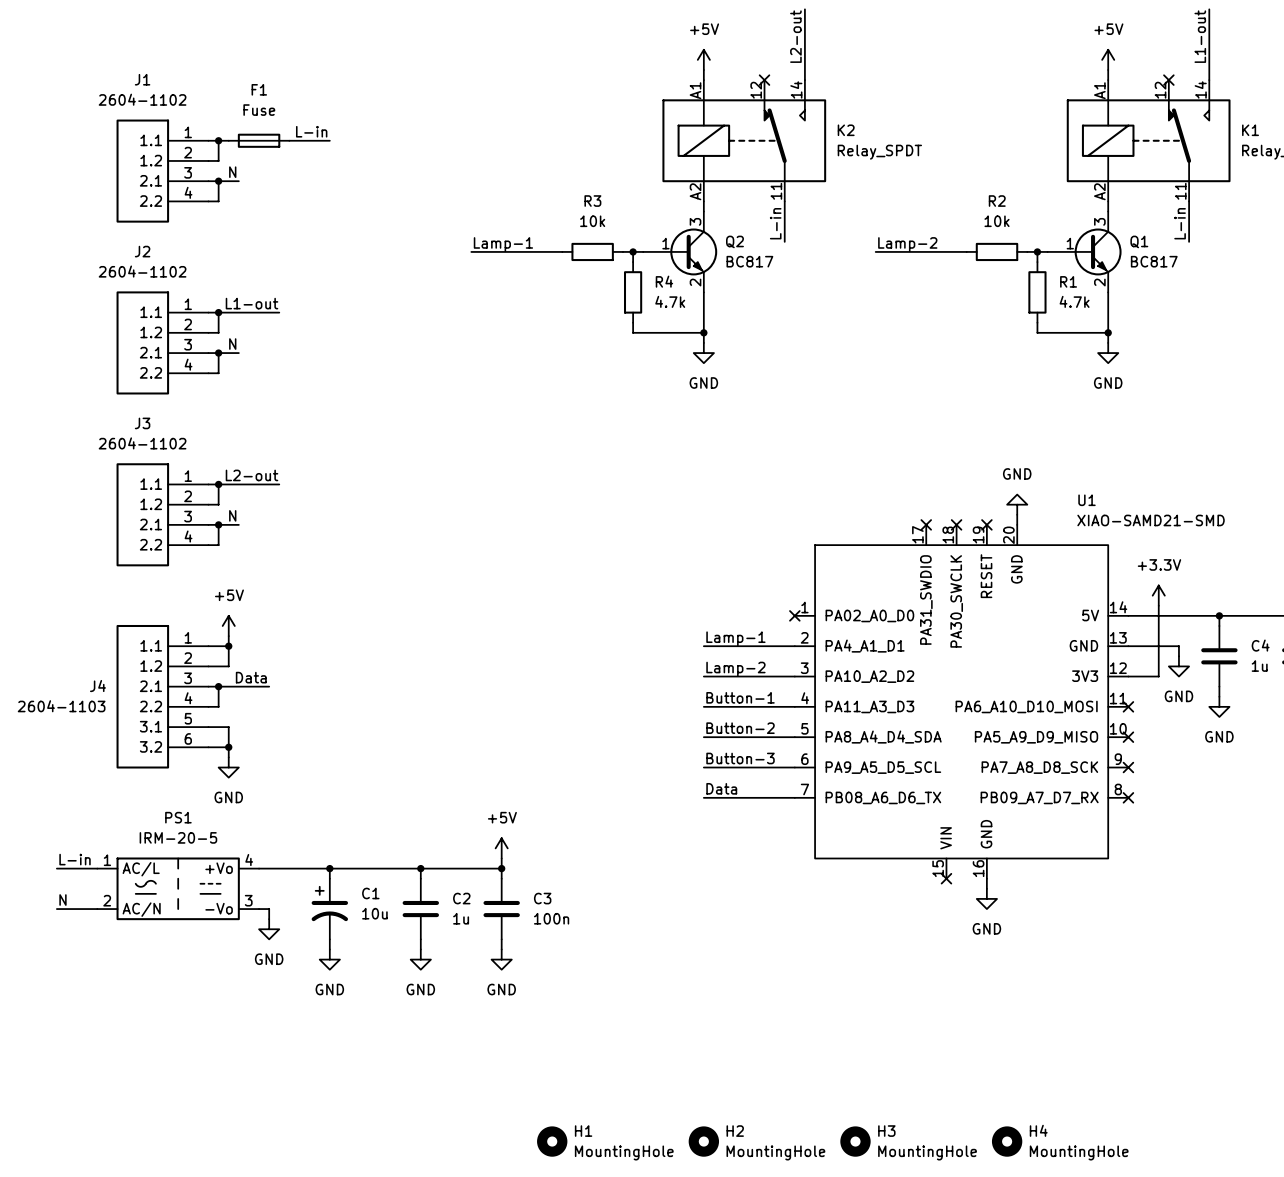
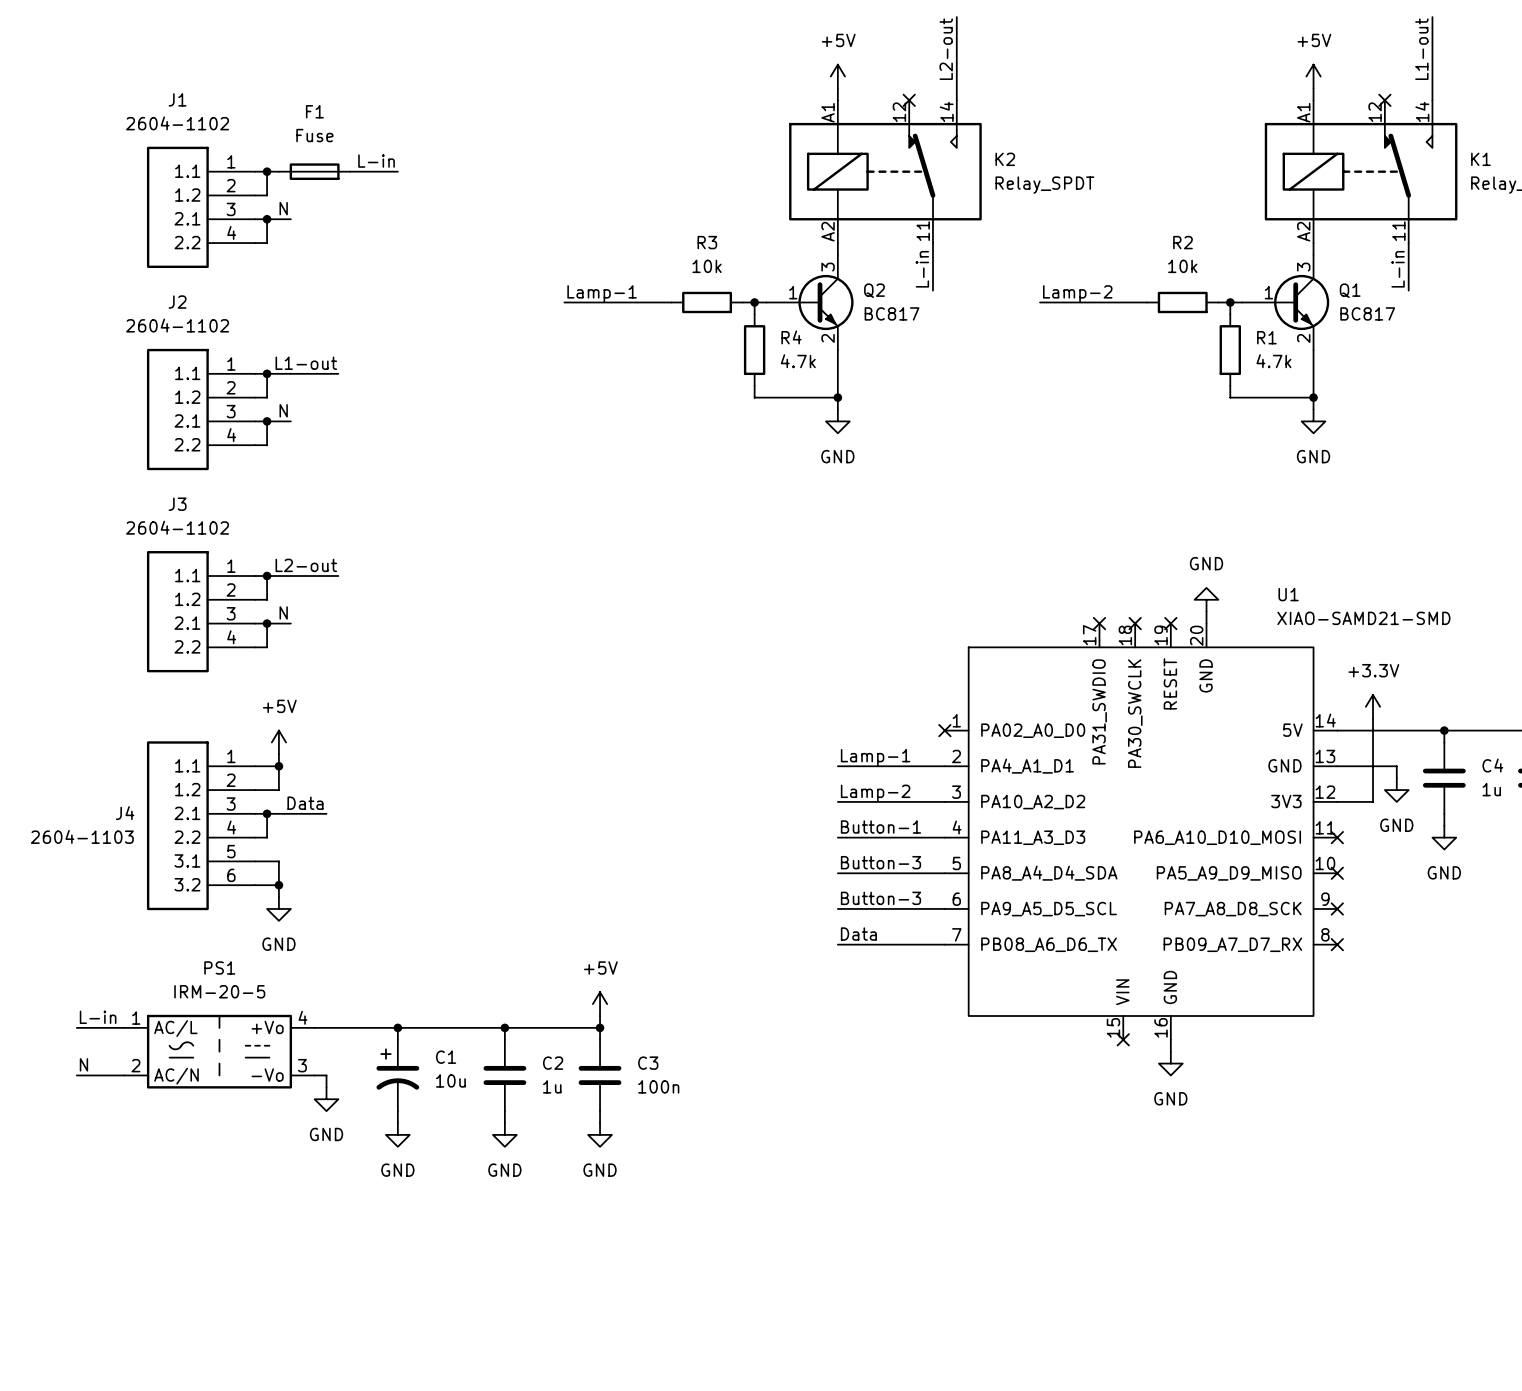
label: Button-2 (740, 728) -> Button-3 (880, 862)
H1: MountingHole (552, 1141) -> none
H2: MountingHole (703, 1141) -> none
H3: MountingHole (855, 1141) -> none
H4: MountingHole (1007, 1141) -> none

